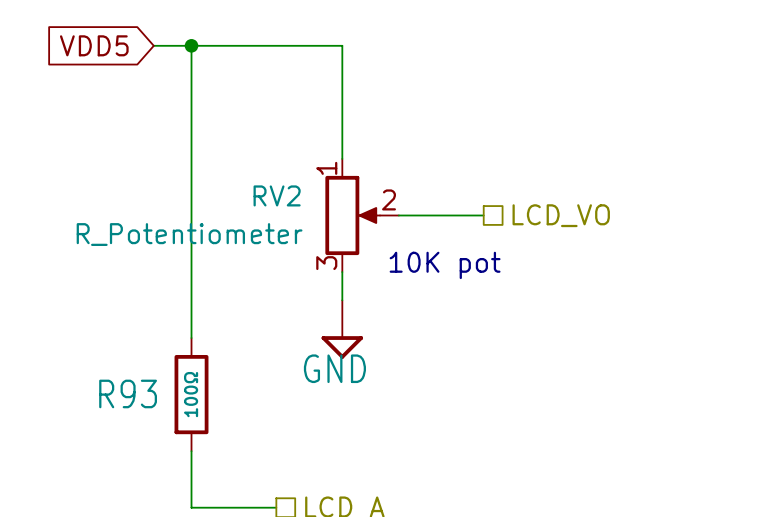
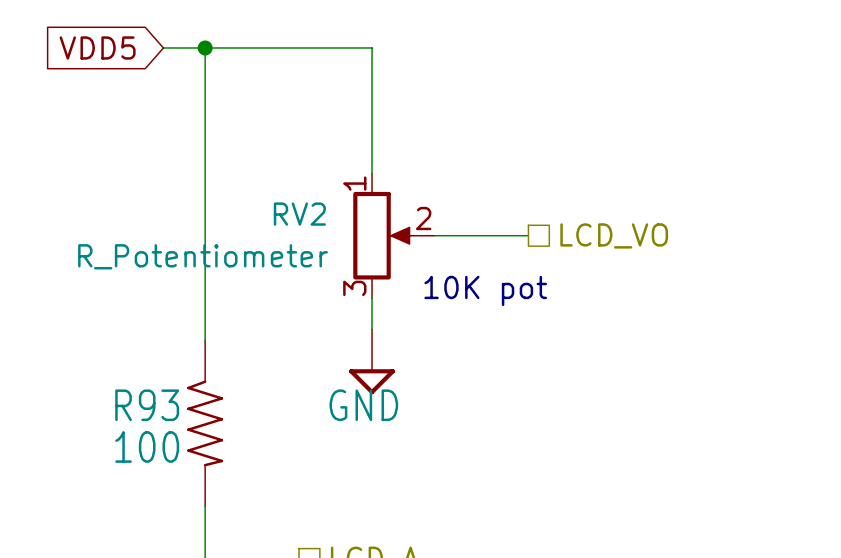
R93 symbol: [174, 338, 209, 452] -> [187, 340, 224, 507]
R93 value: 100Ω (191, 394) -> 100 (147, 446)

